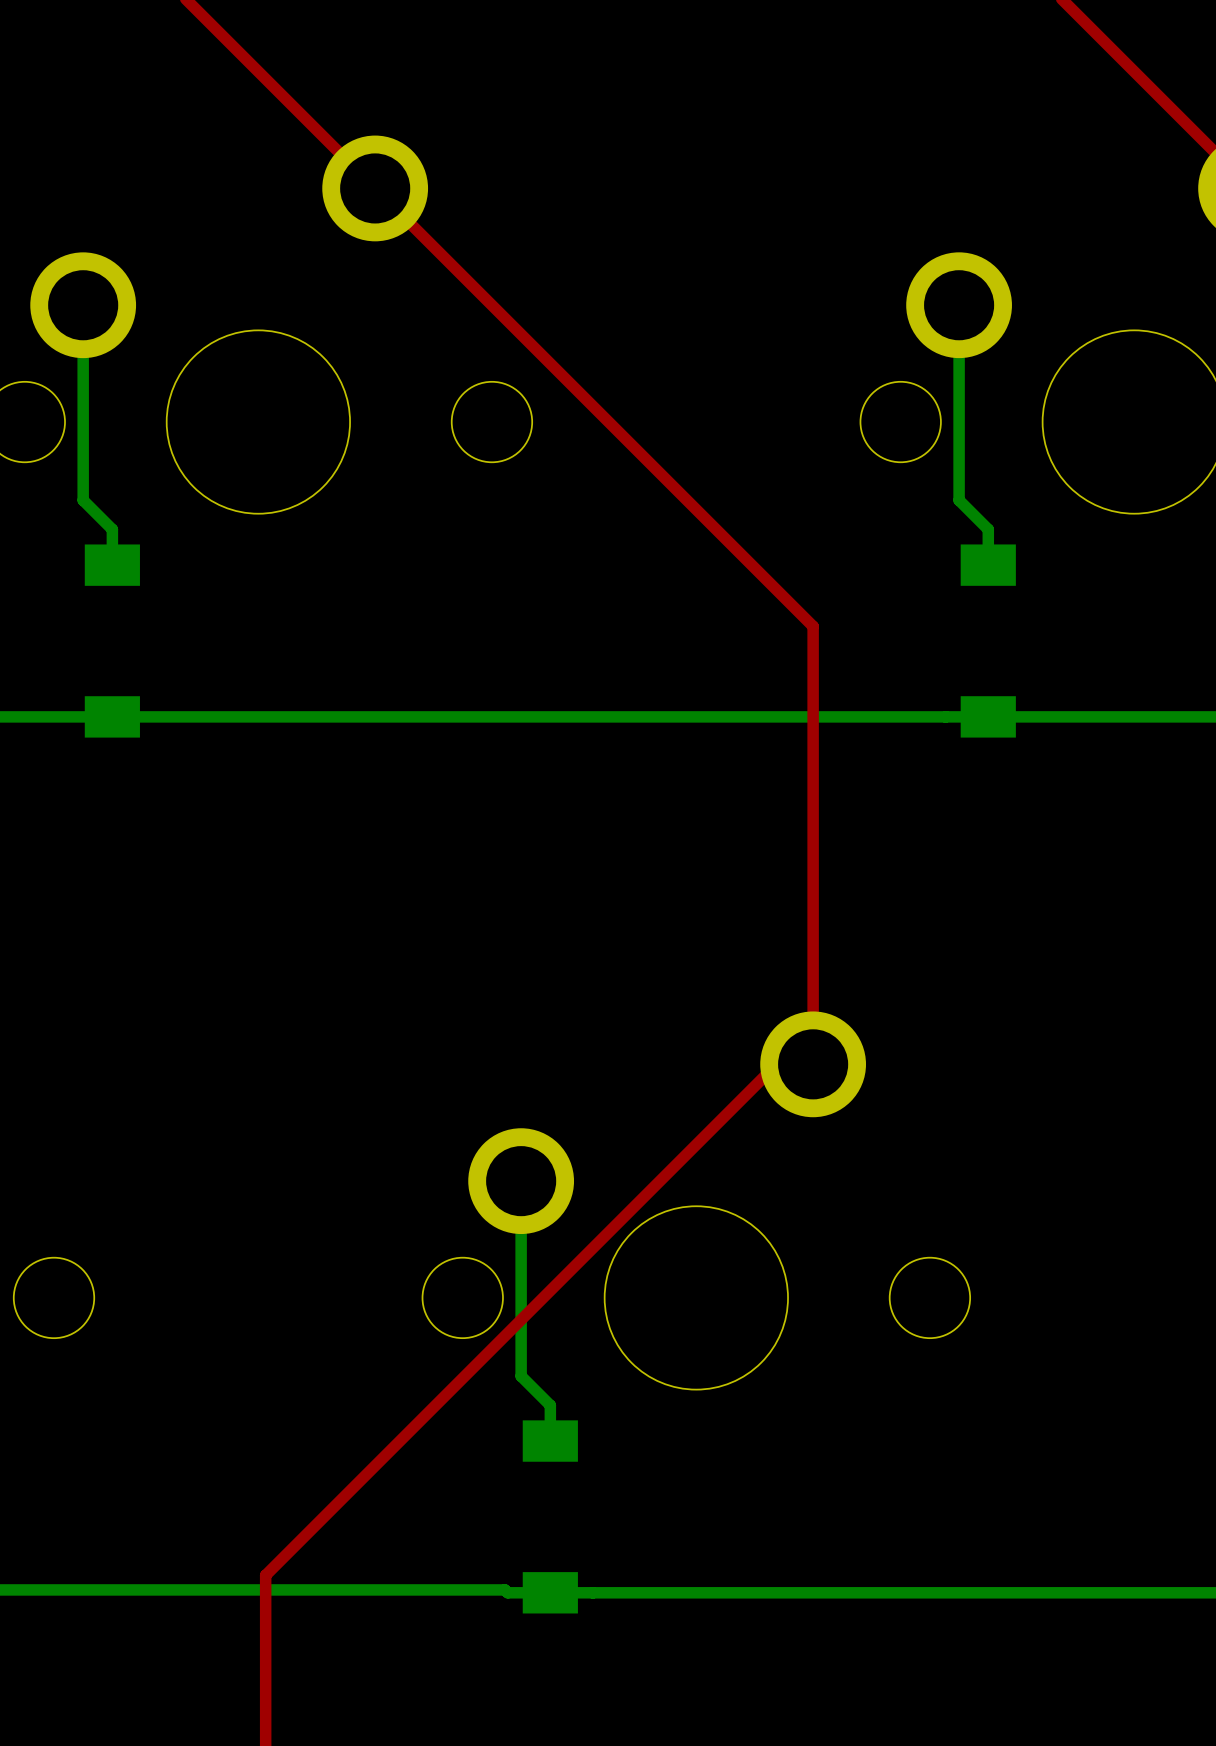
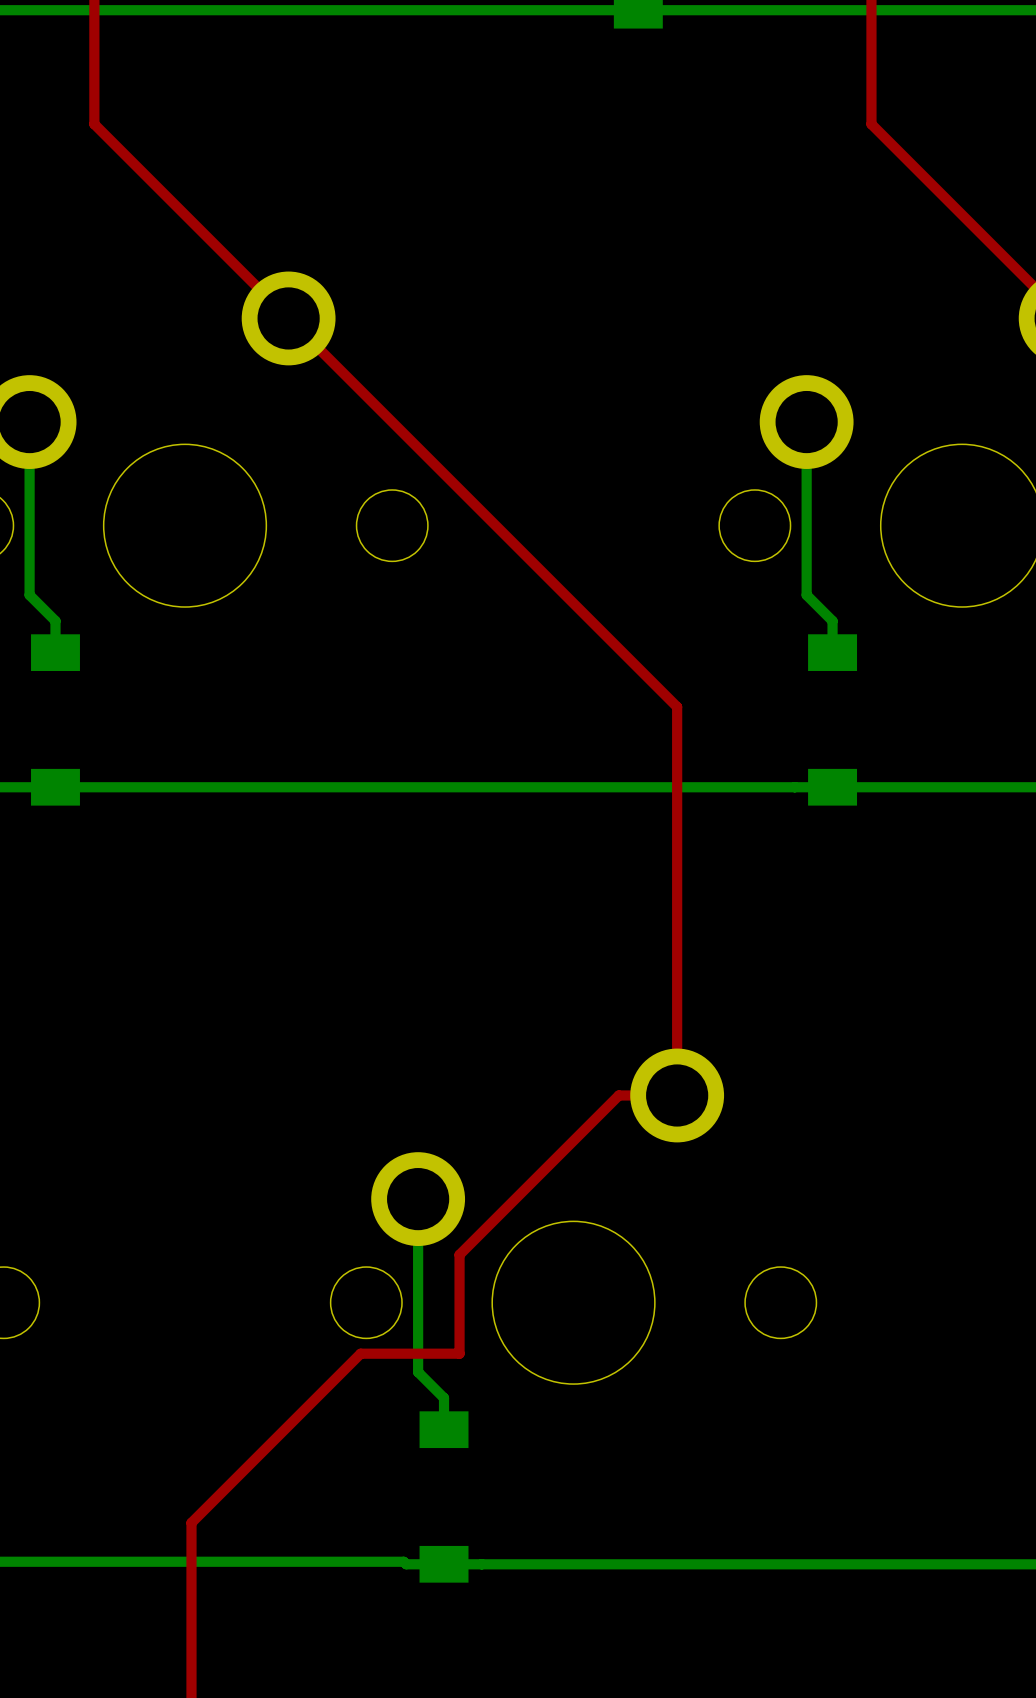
top track: (776, 1064) (265, 1575) -> (644, 1095) (618, 1095) (459, 1254) (459, 1353) (360, 1353) (191, 1522) (191, 1548)

